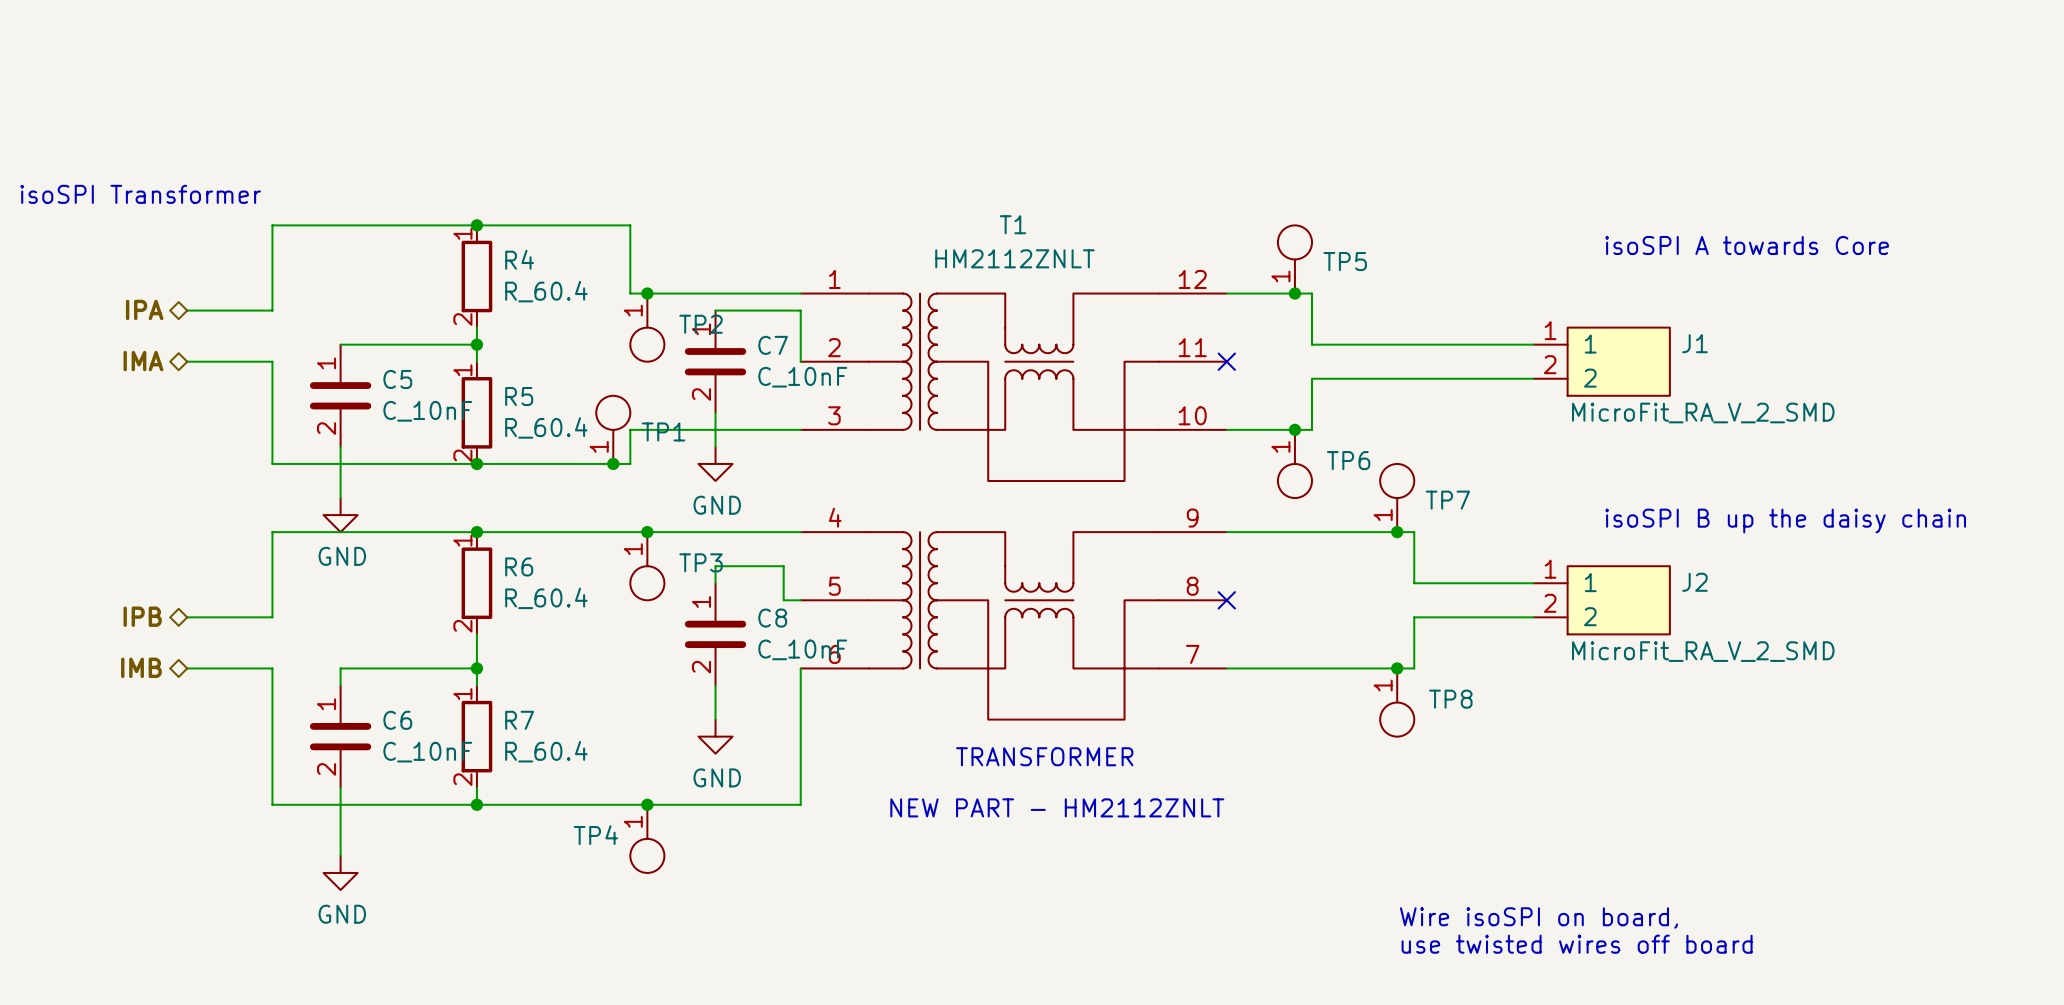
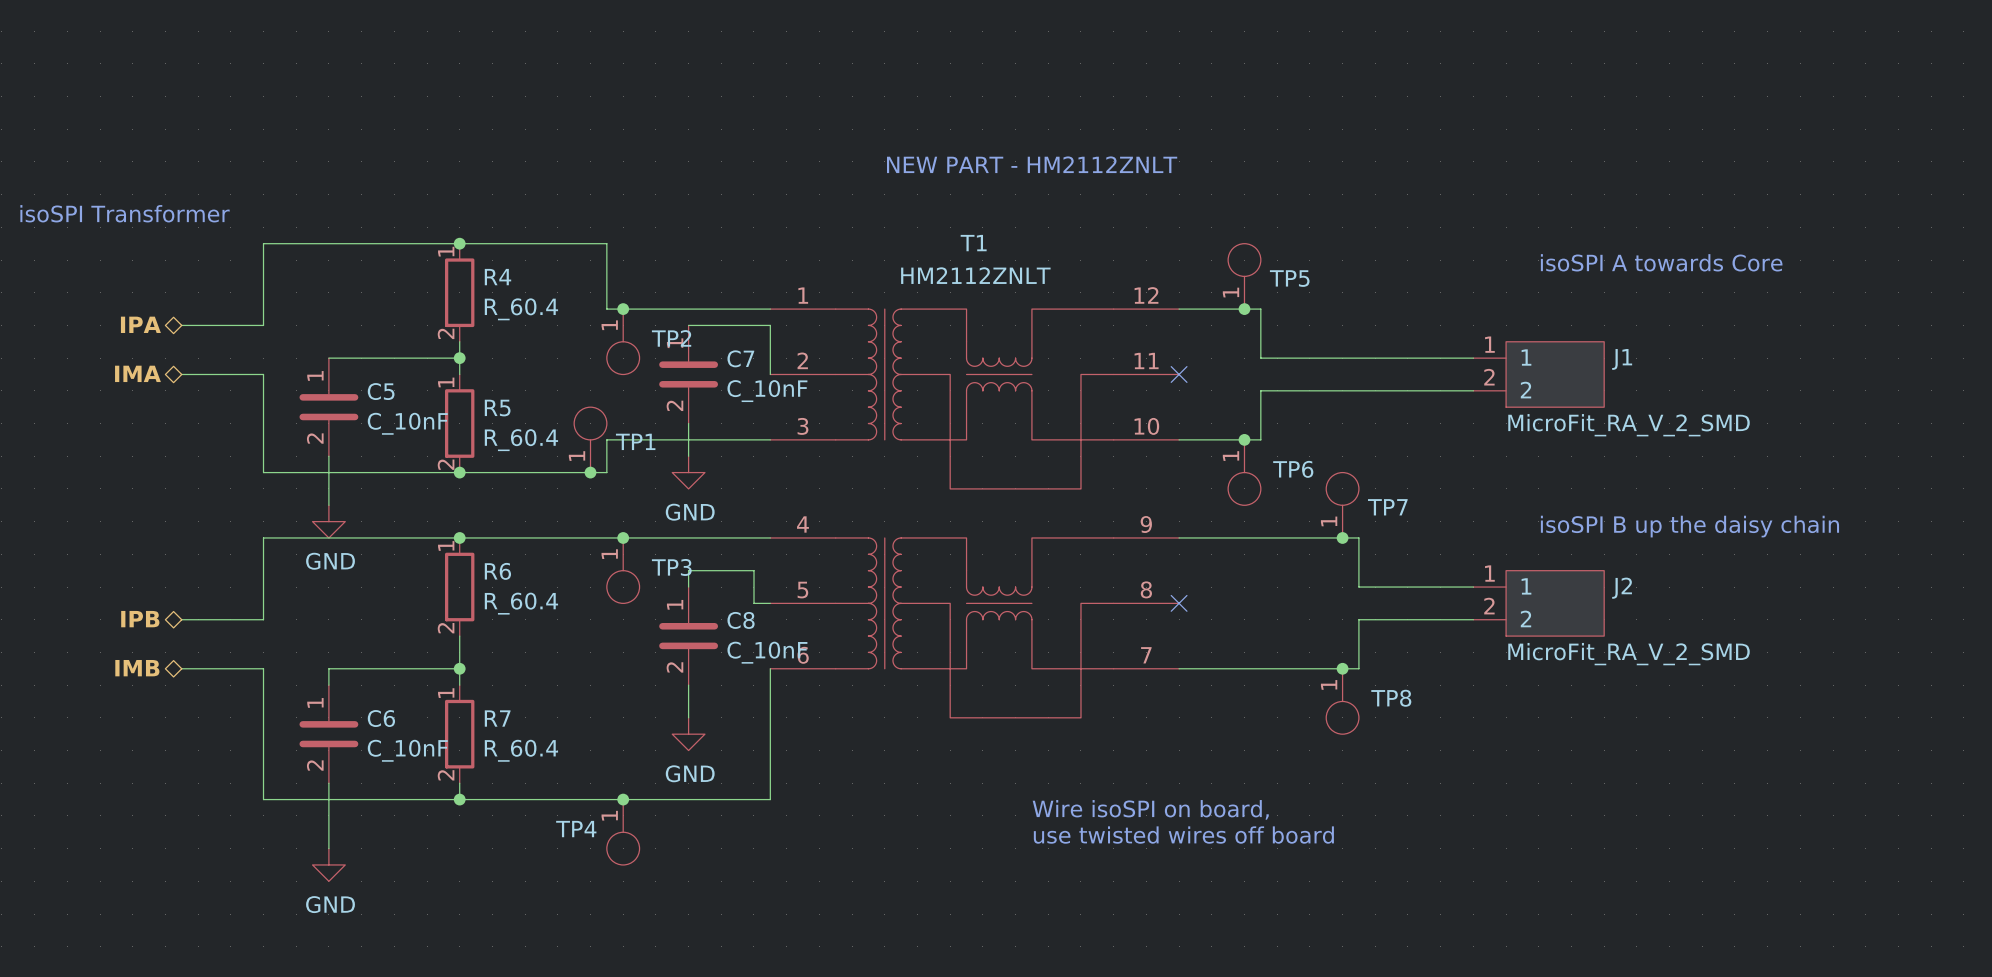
text: none -> NEW PART - HM2112ZNLT (1032, 164)
text: TRANSFORMER (1044, 756) -> none
text: NEW PART - HM2112ZNLT (1057, 807) -> none
text: none -> Wire isoSPI on board, (1150, 809)
text: none -> use twisted wires off board (1183, 835)
text: Wire isoSPI on board, (1538, 917) -> none
text: use twisted wires off board (1577, 944) -> none

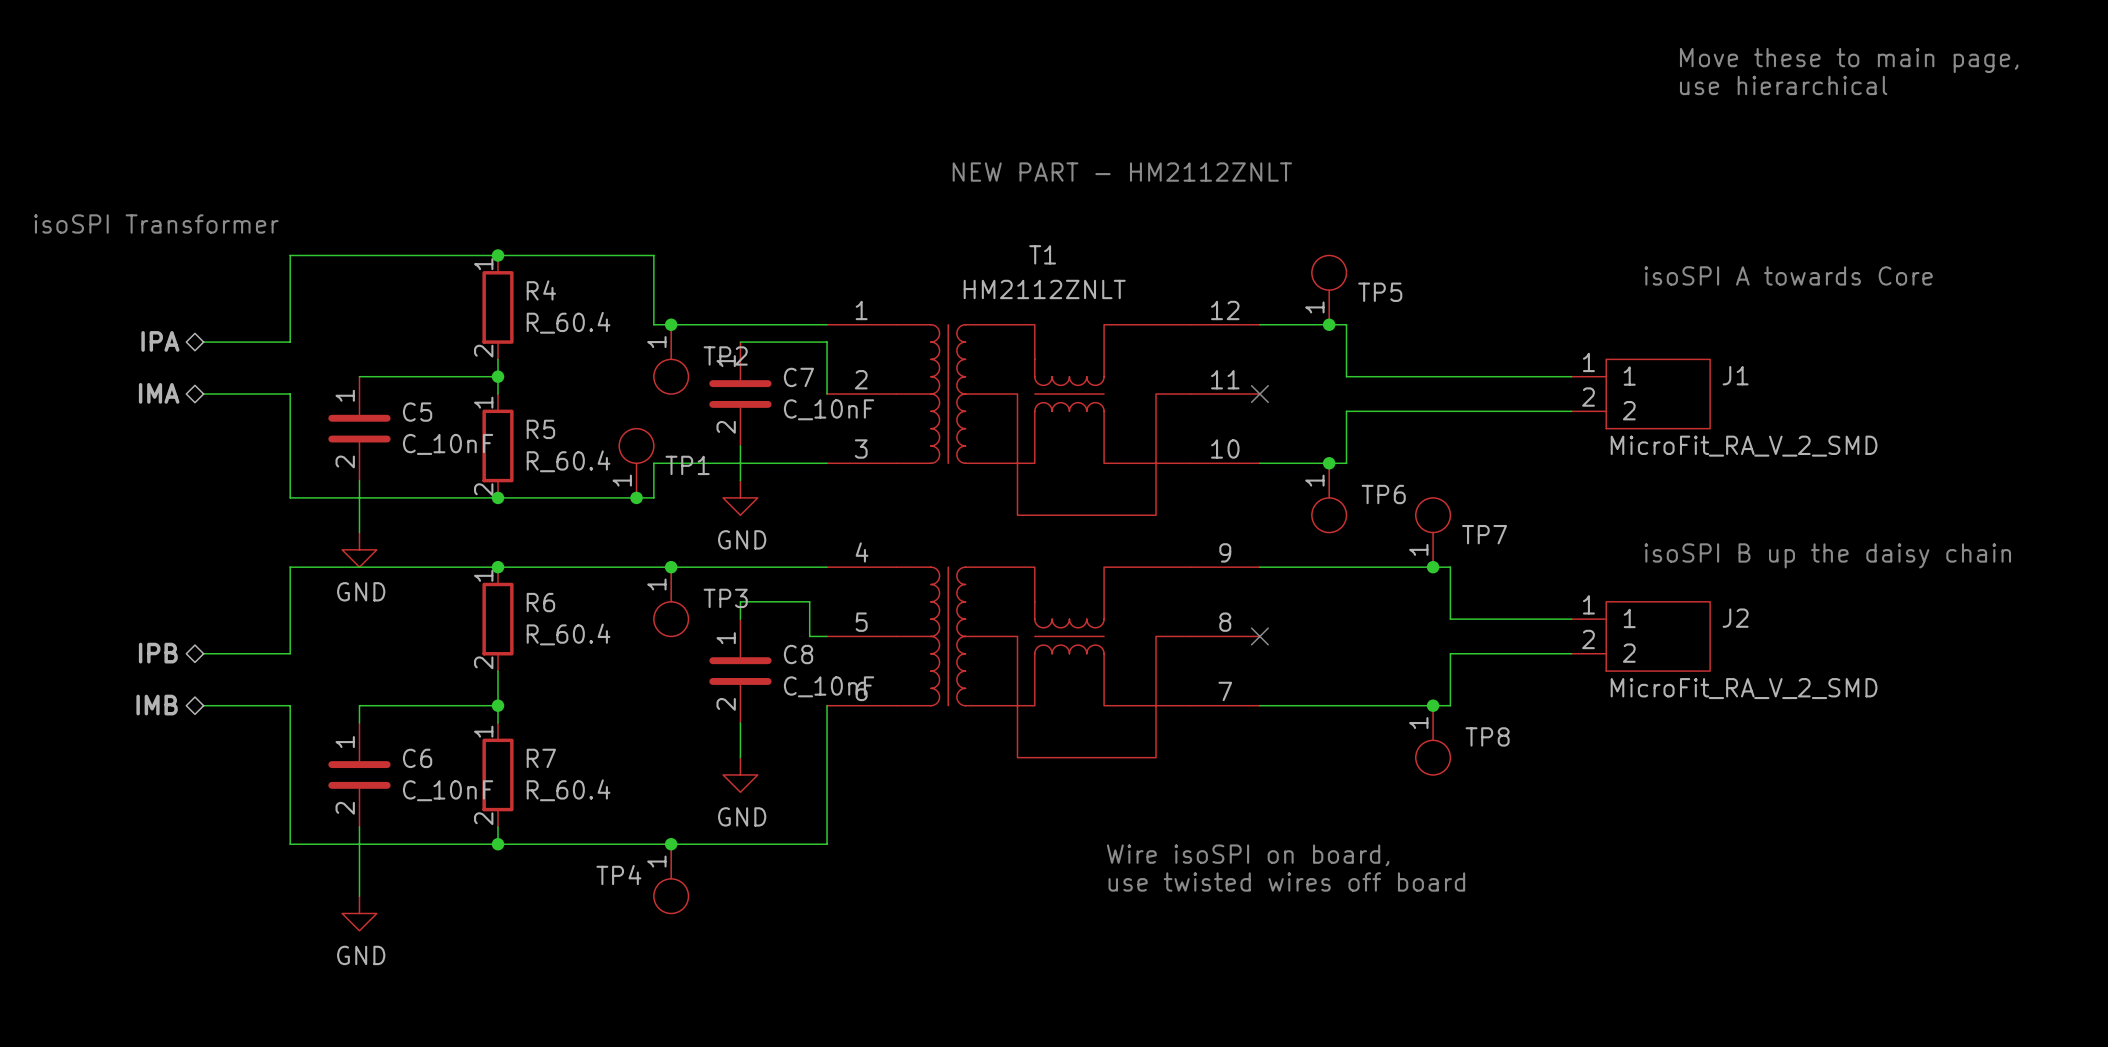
text: none -> Move these to main page, (1849, 60)
text: none -> use hierarchical (1783, 85)

